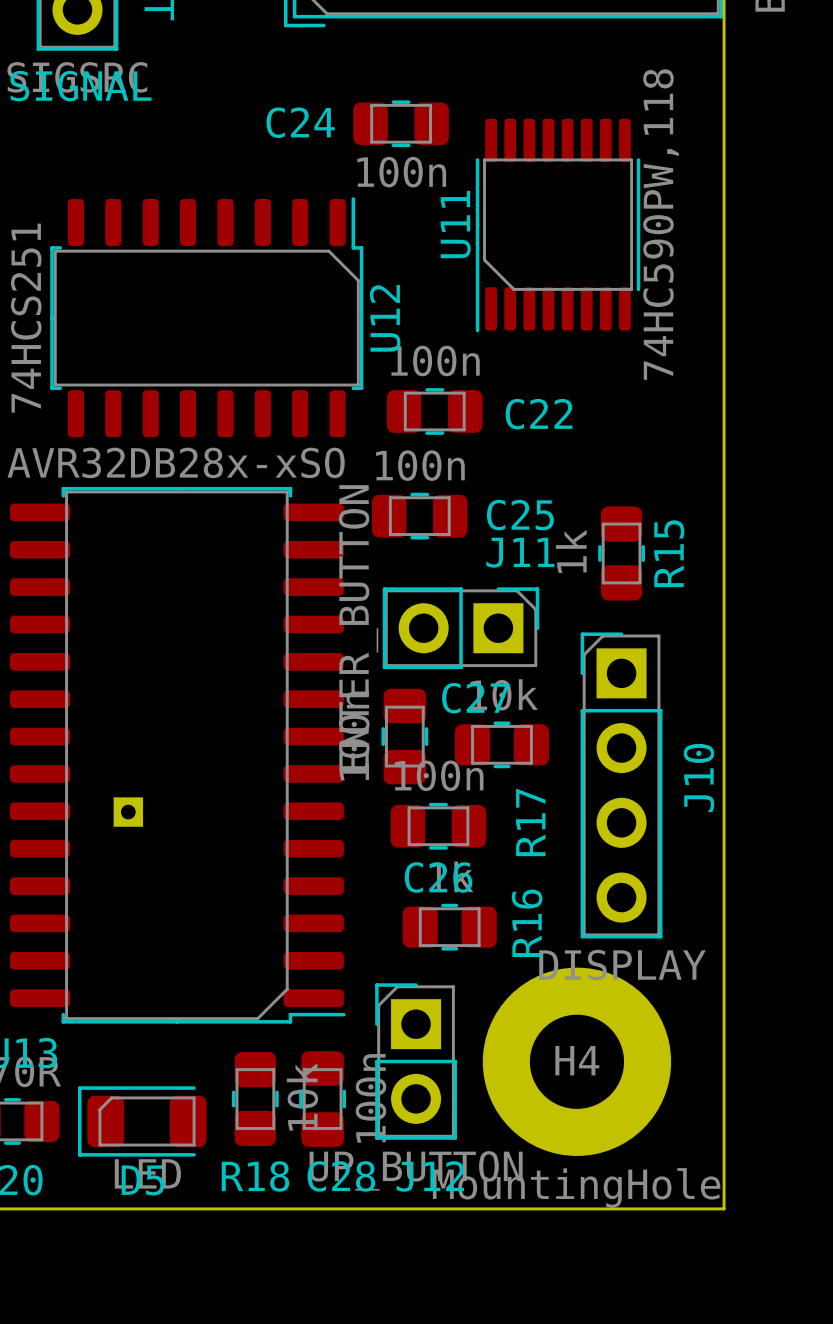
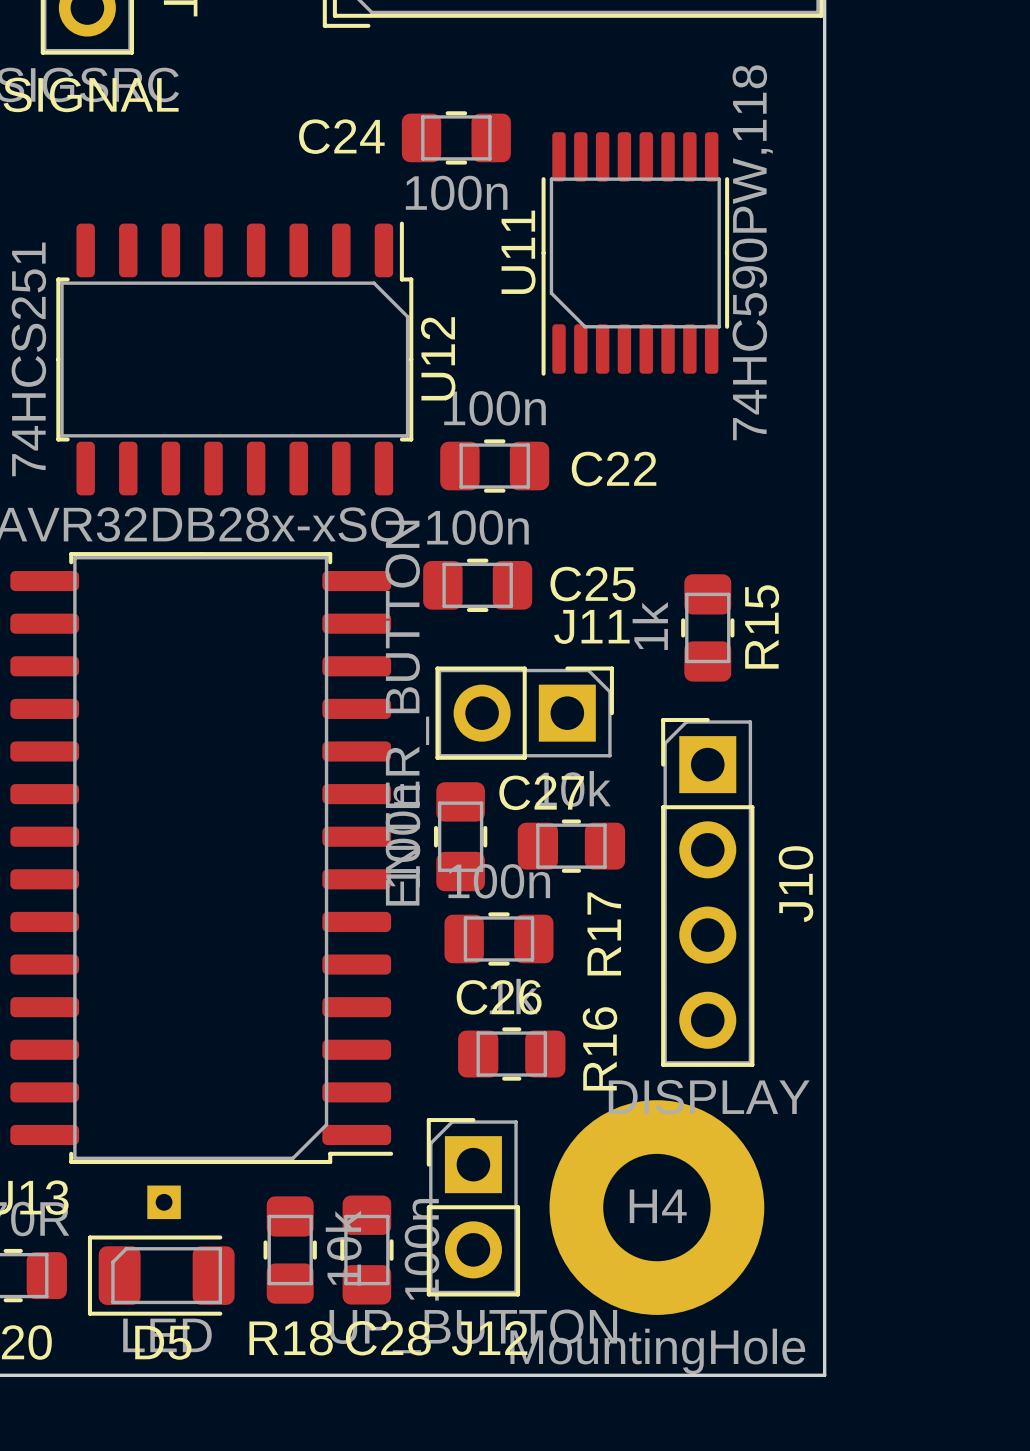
part position: (128, 812) -> (164, 1202)

